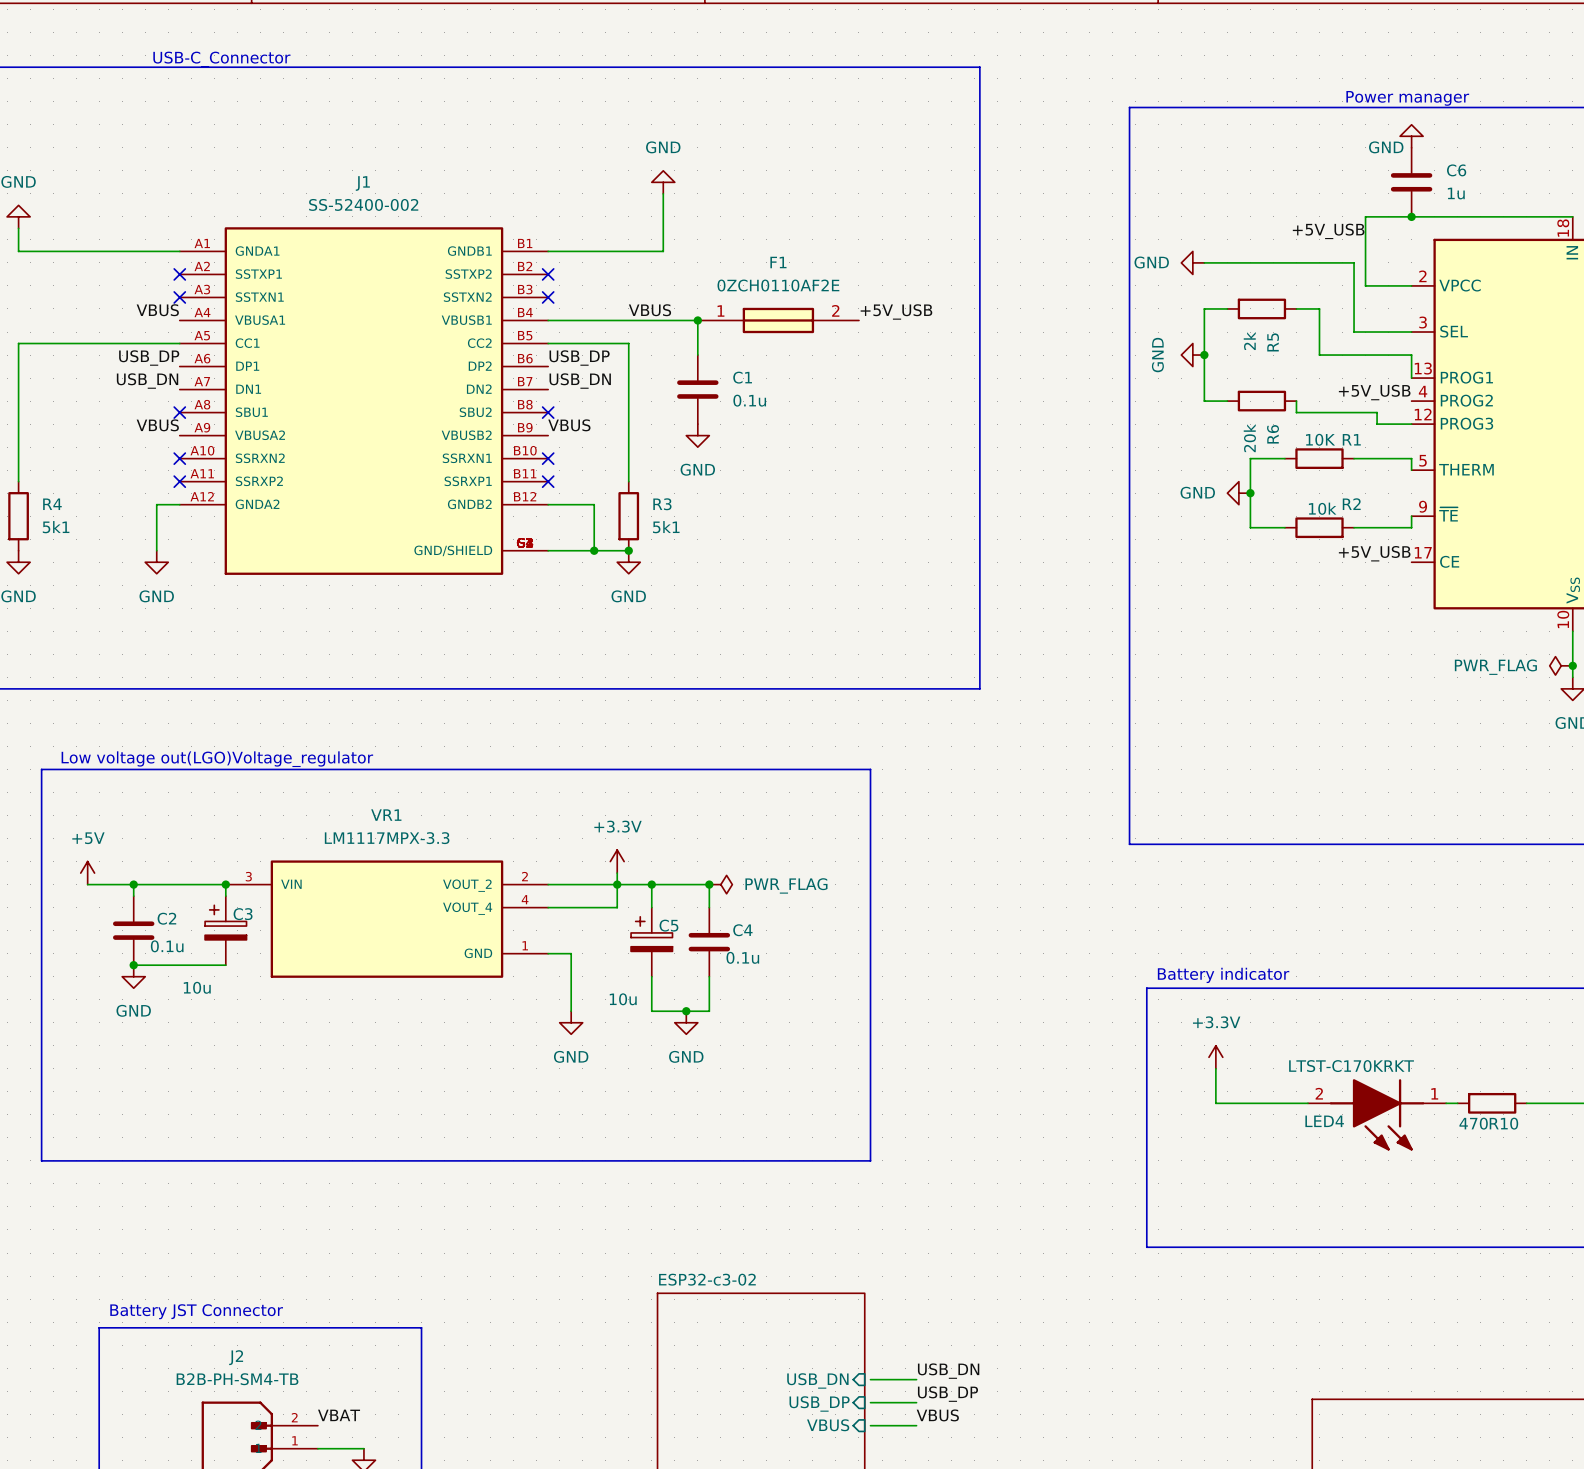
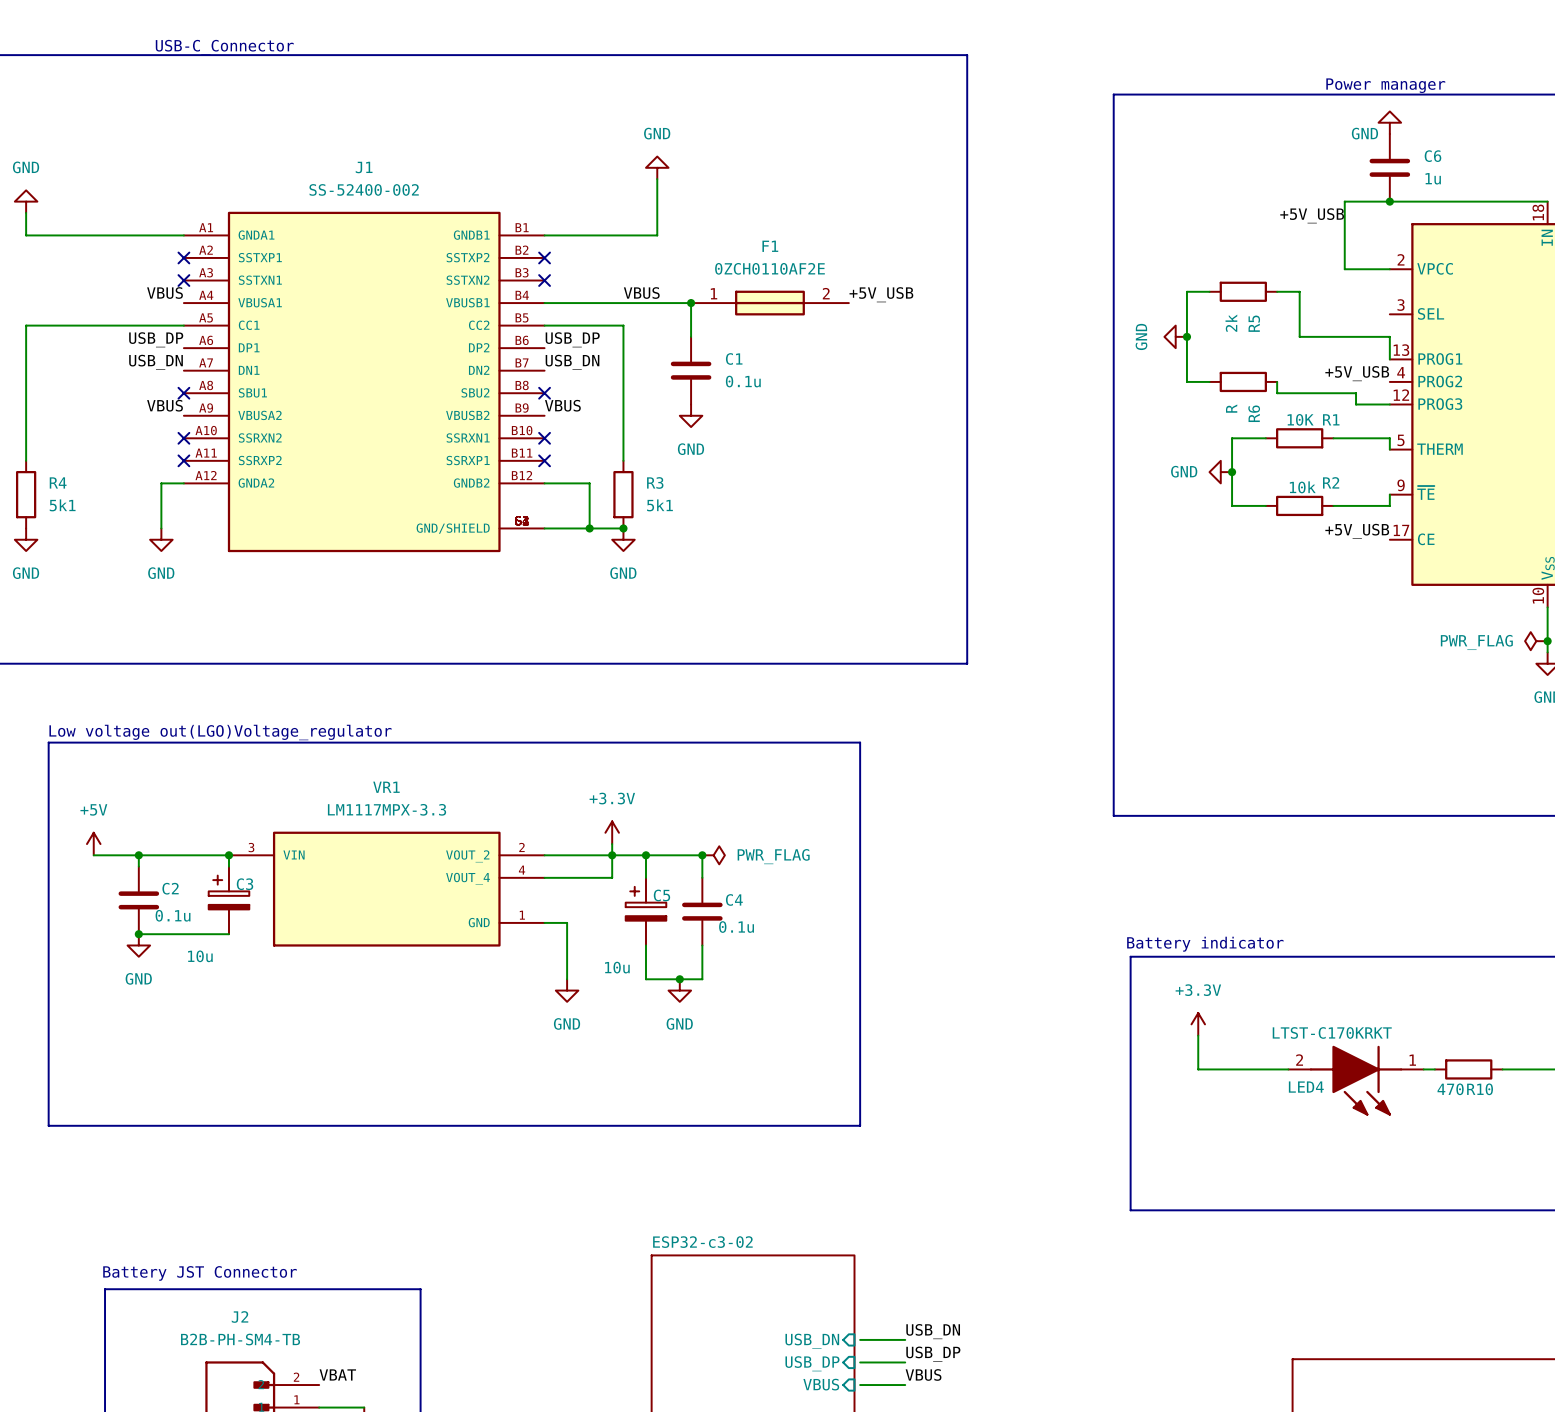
power symbol: GND (1192, 262) -> none
wire: (1204, 262) (1354, 262) (1354, 332) (1411, 332) -> none
R6 value: 20k (1249, 438) -> R (1231, 408)

